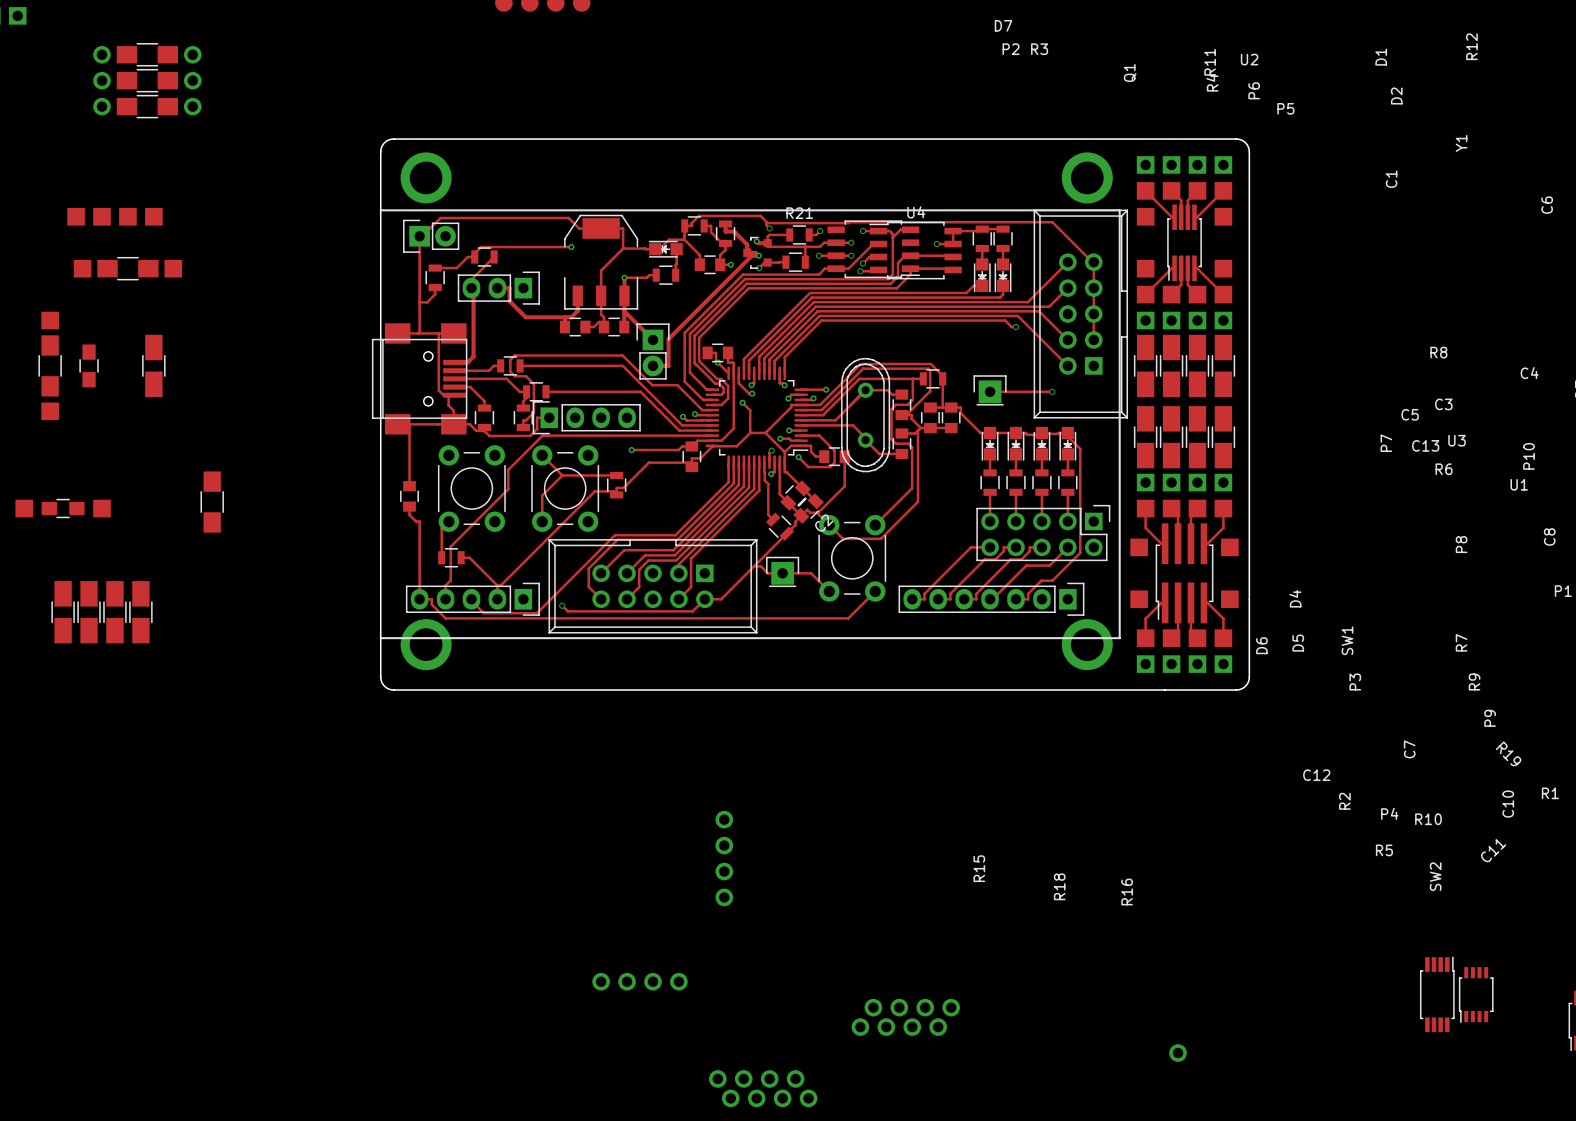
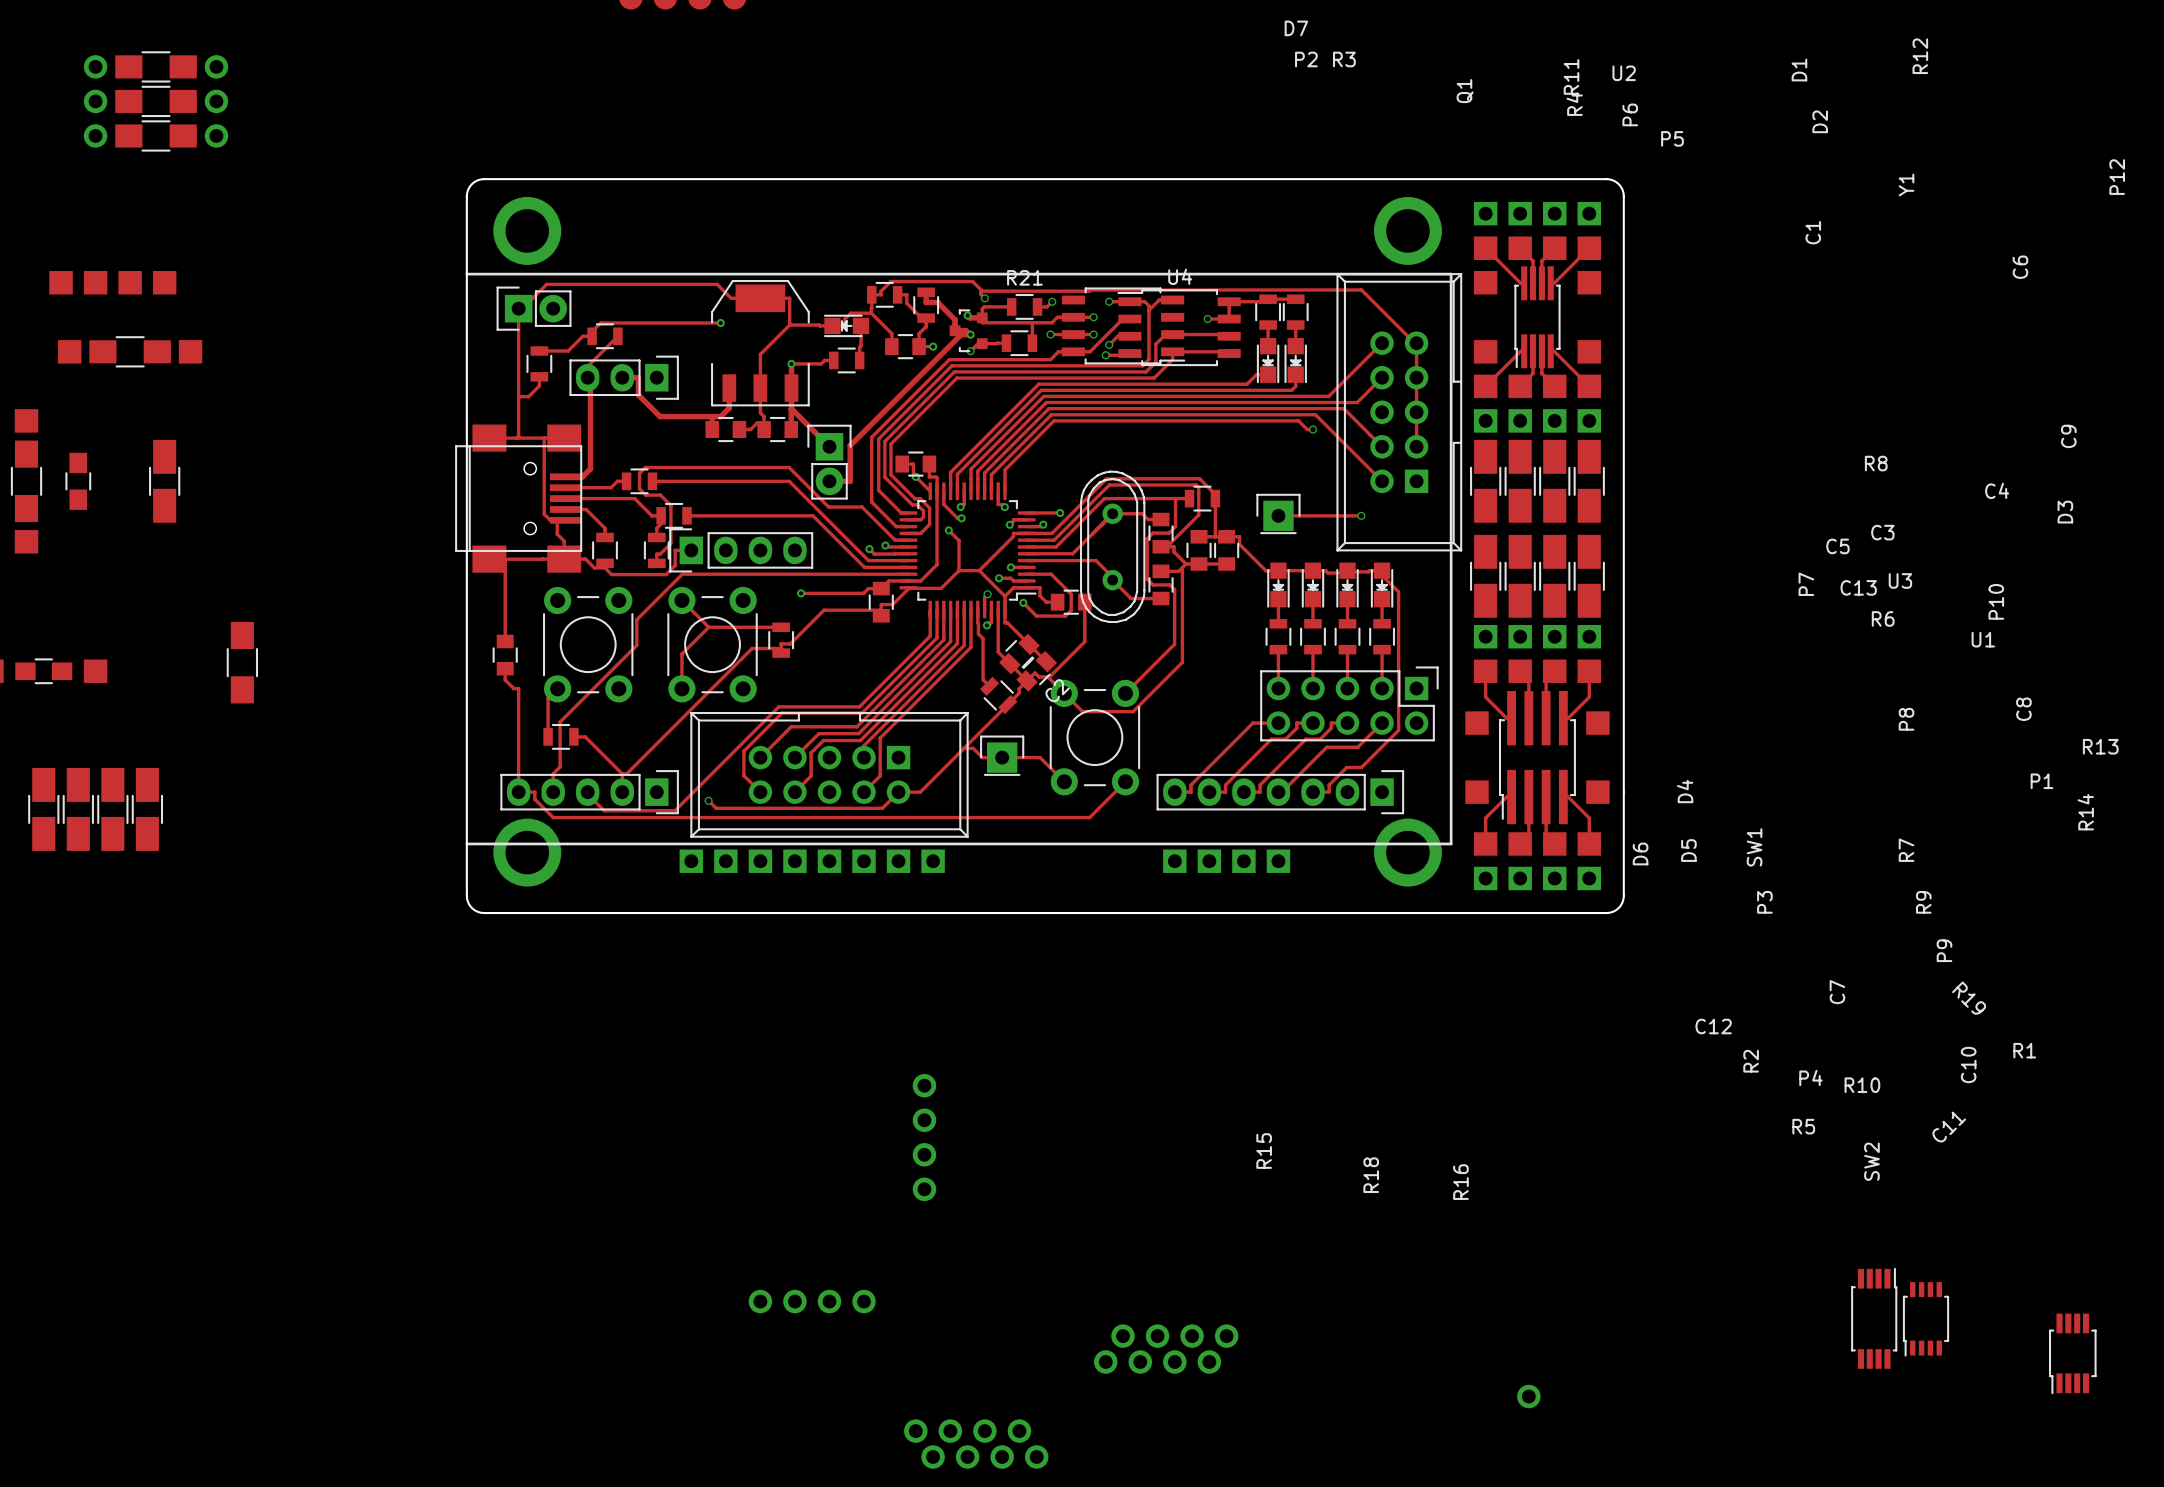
part: none -> (691, 861)
part: none -> (725, 861)
part: none -> (760, 861)
part: none -> (794, 861)
part: none -> (829, 861)
part: none -> (864, 861)
part: none -> (898, 861)
part: none -> (933, 861)
part: none -> (1174, 861)
part: none -> (1209, 861)
part: none -> (1243, 861)
part: none -> (1278, 861)

